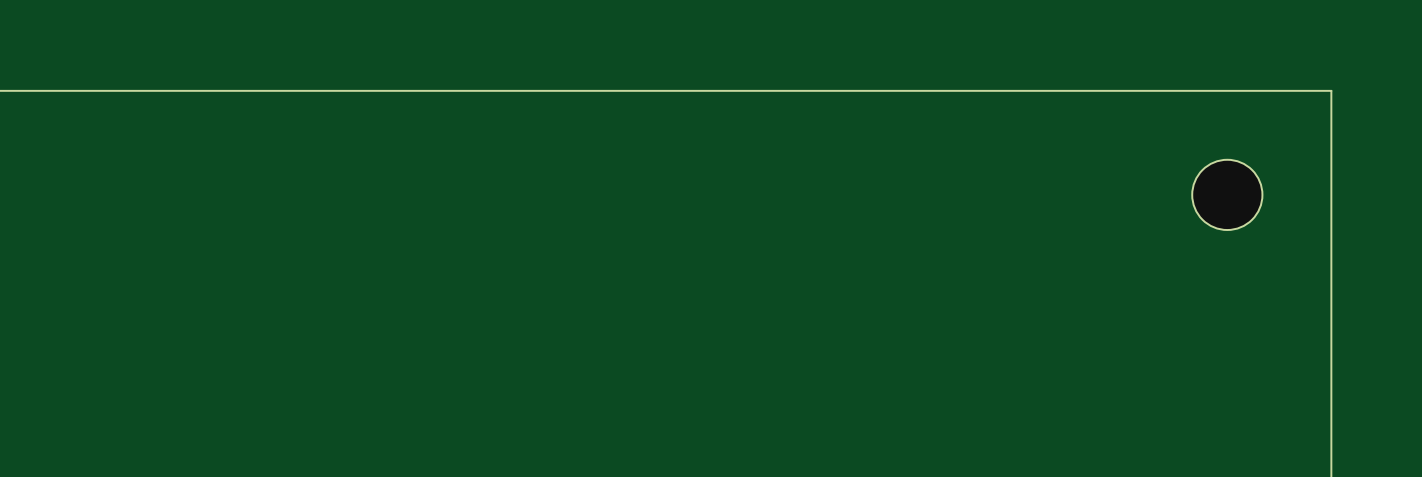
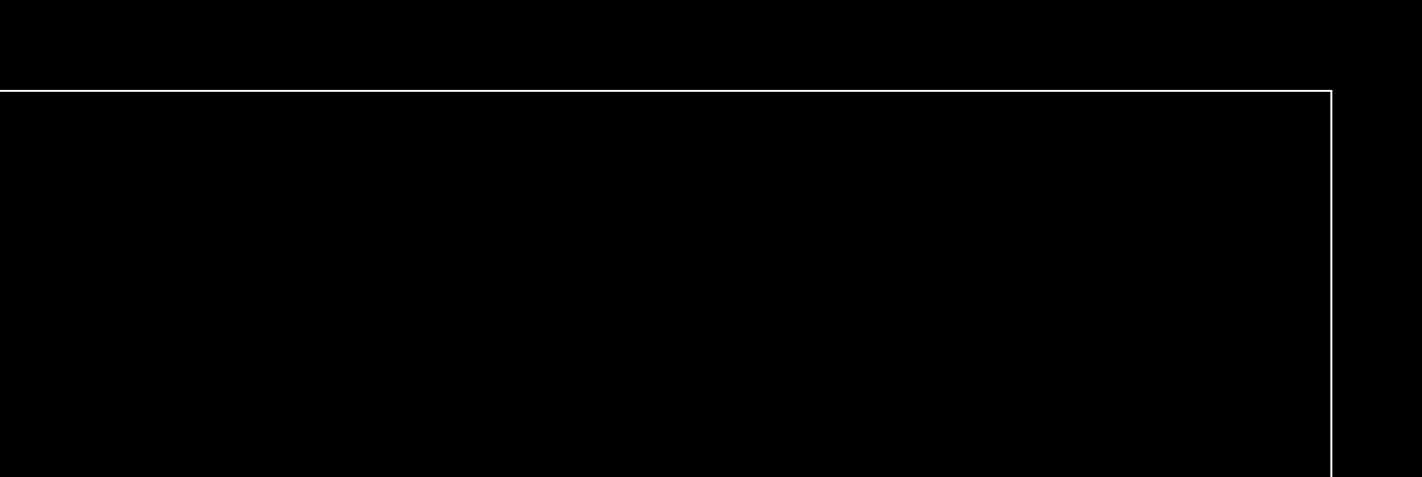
part: (1227, 194) -> none

